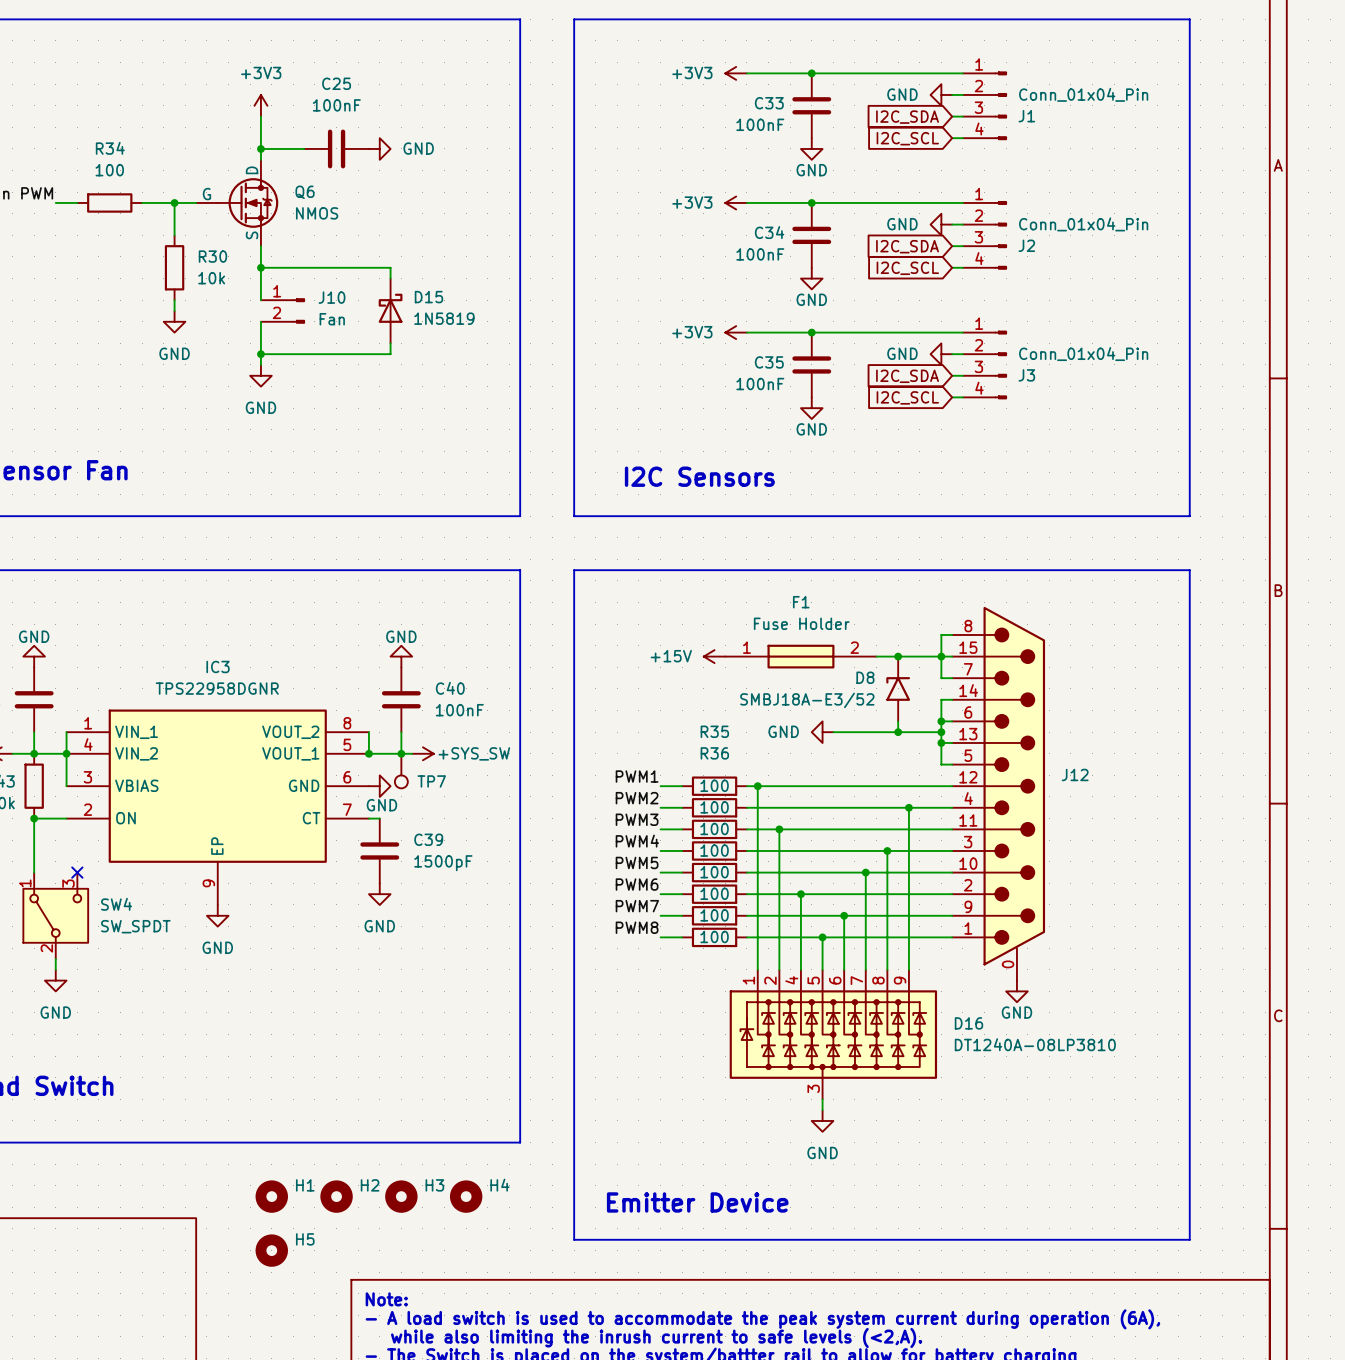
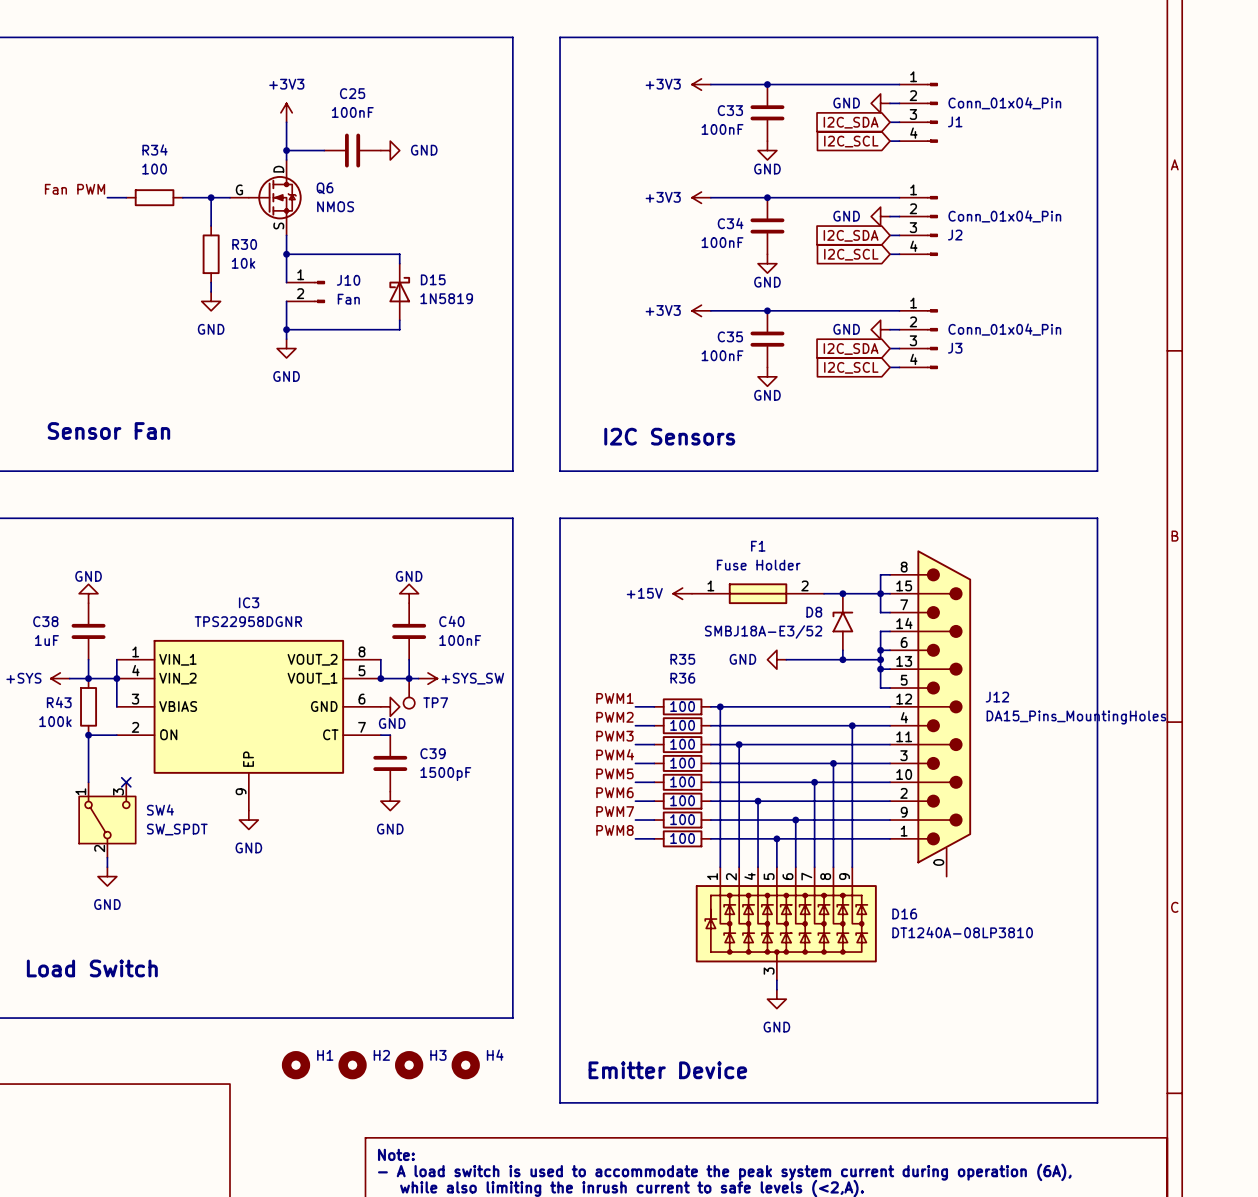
J12 value: none -> DA15_Pins_MountingHoles (1076, 717)
power symbol: GND (1016, 991) -> none
H5: (271, 1250) -> none

